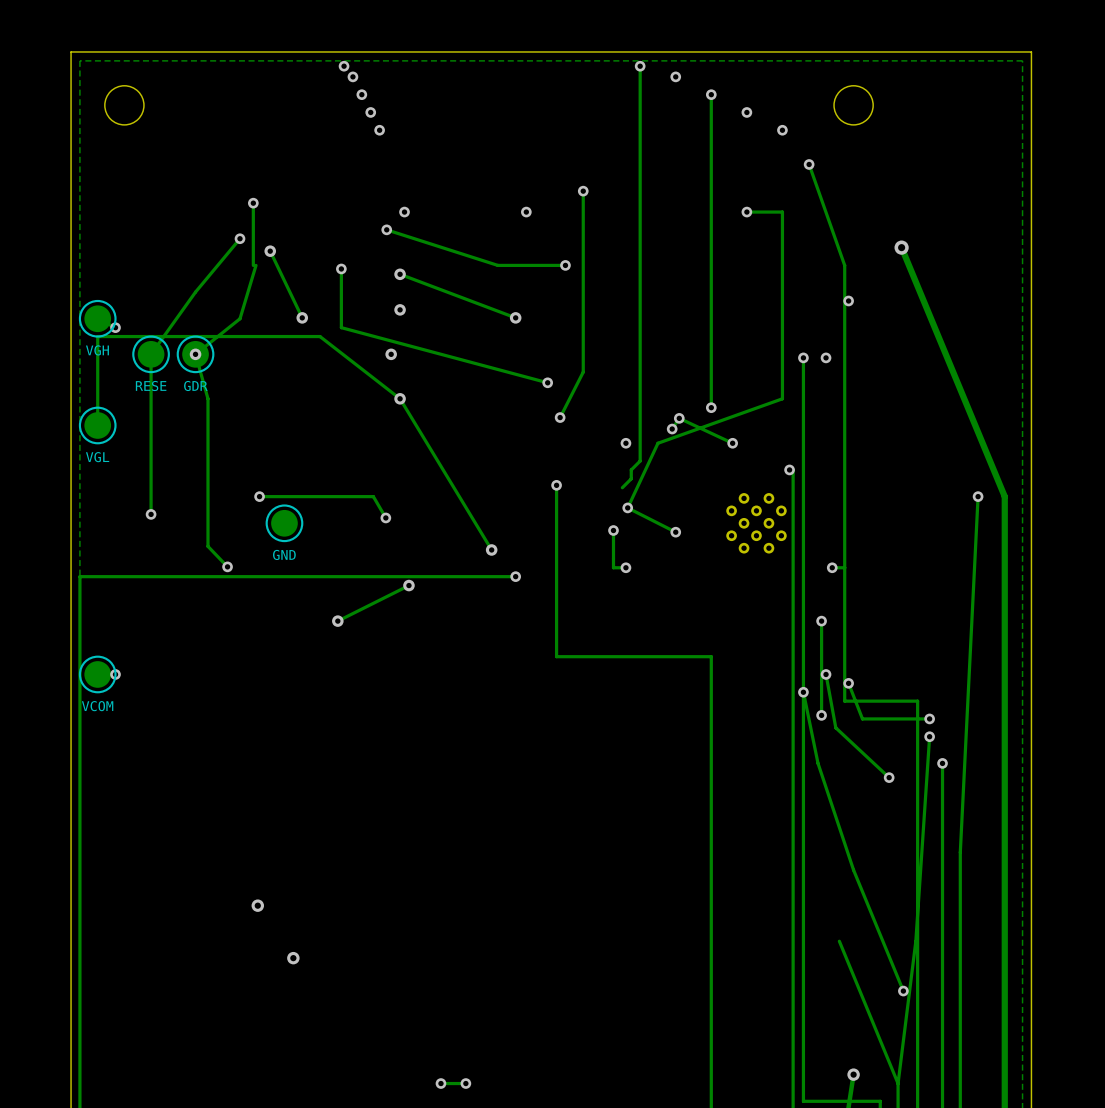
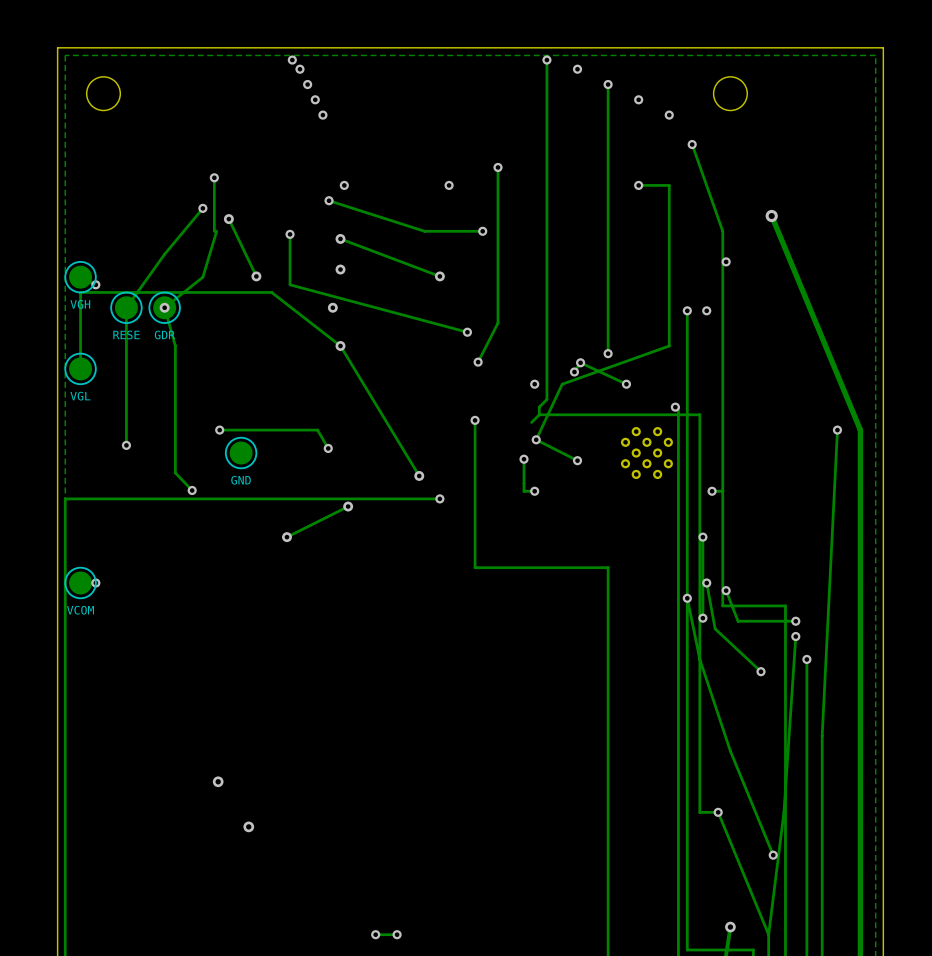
track: none -> (539, 414) (699, 414) (699, 812) (718, 812)
via: none -> (718, 812)

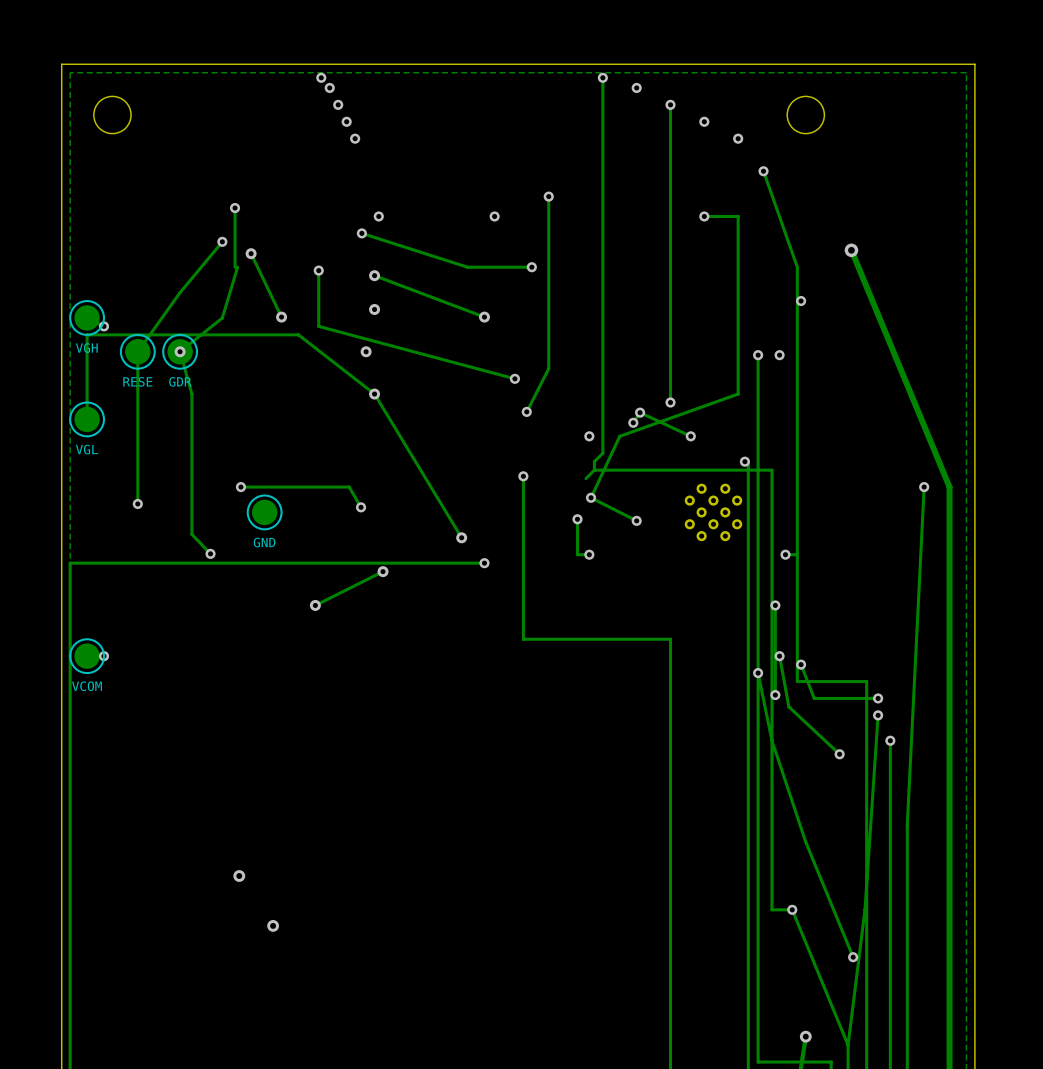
via: (375, 934) -> none
track: (397, 934) (375, 934) -> none
via: (397, 934) -> none

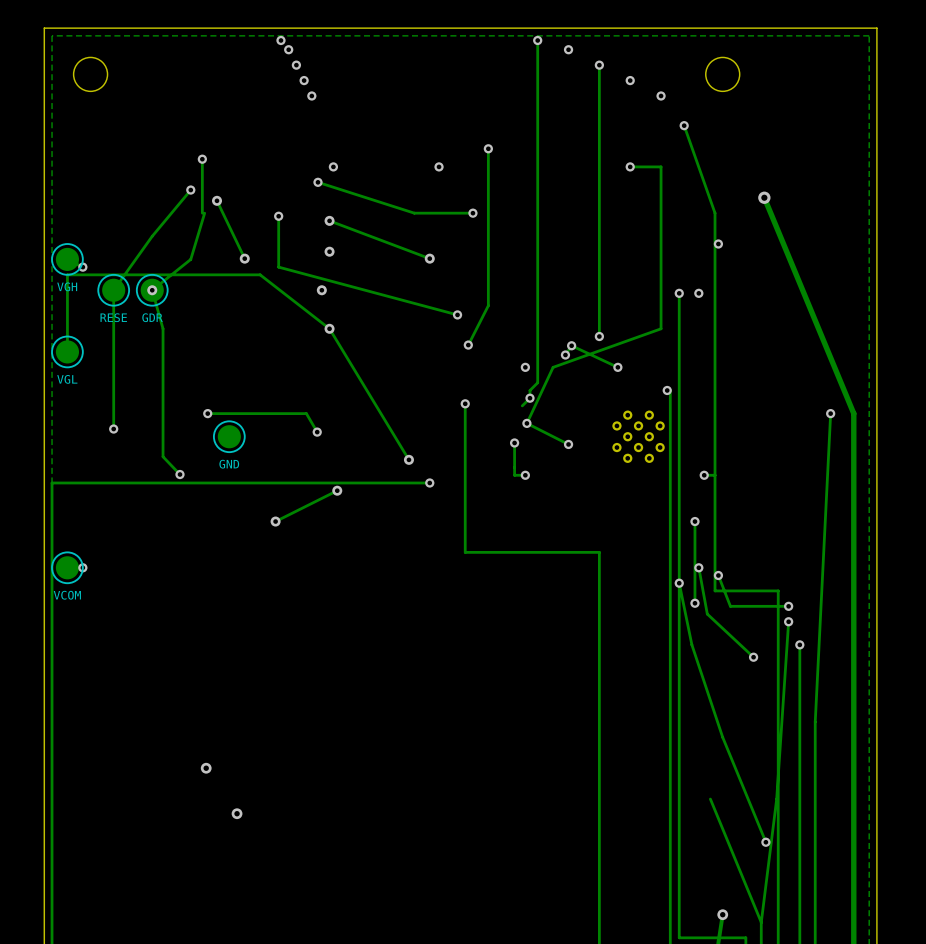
track: (594, 470) (771, 470) (771, 909) (792, 909) -> none
via: none -> (529, 398)
via: (792, 909) -> none

